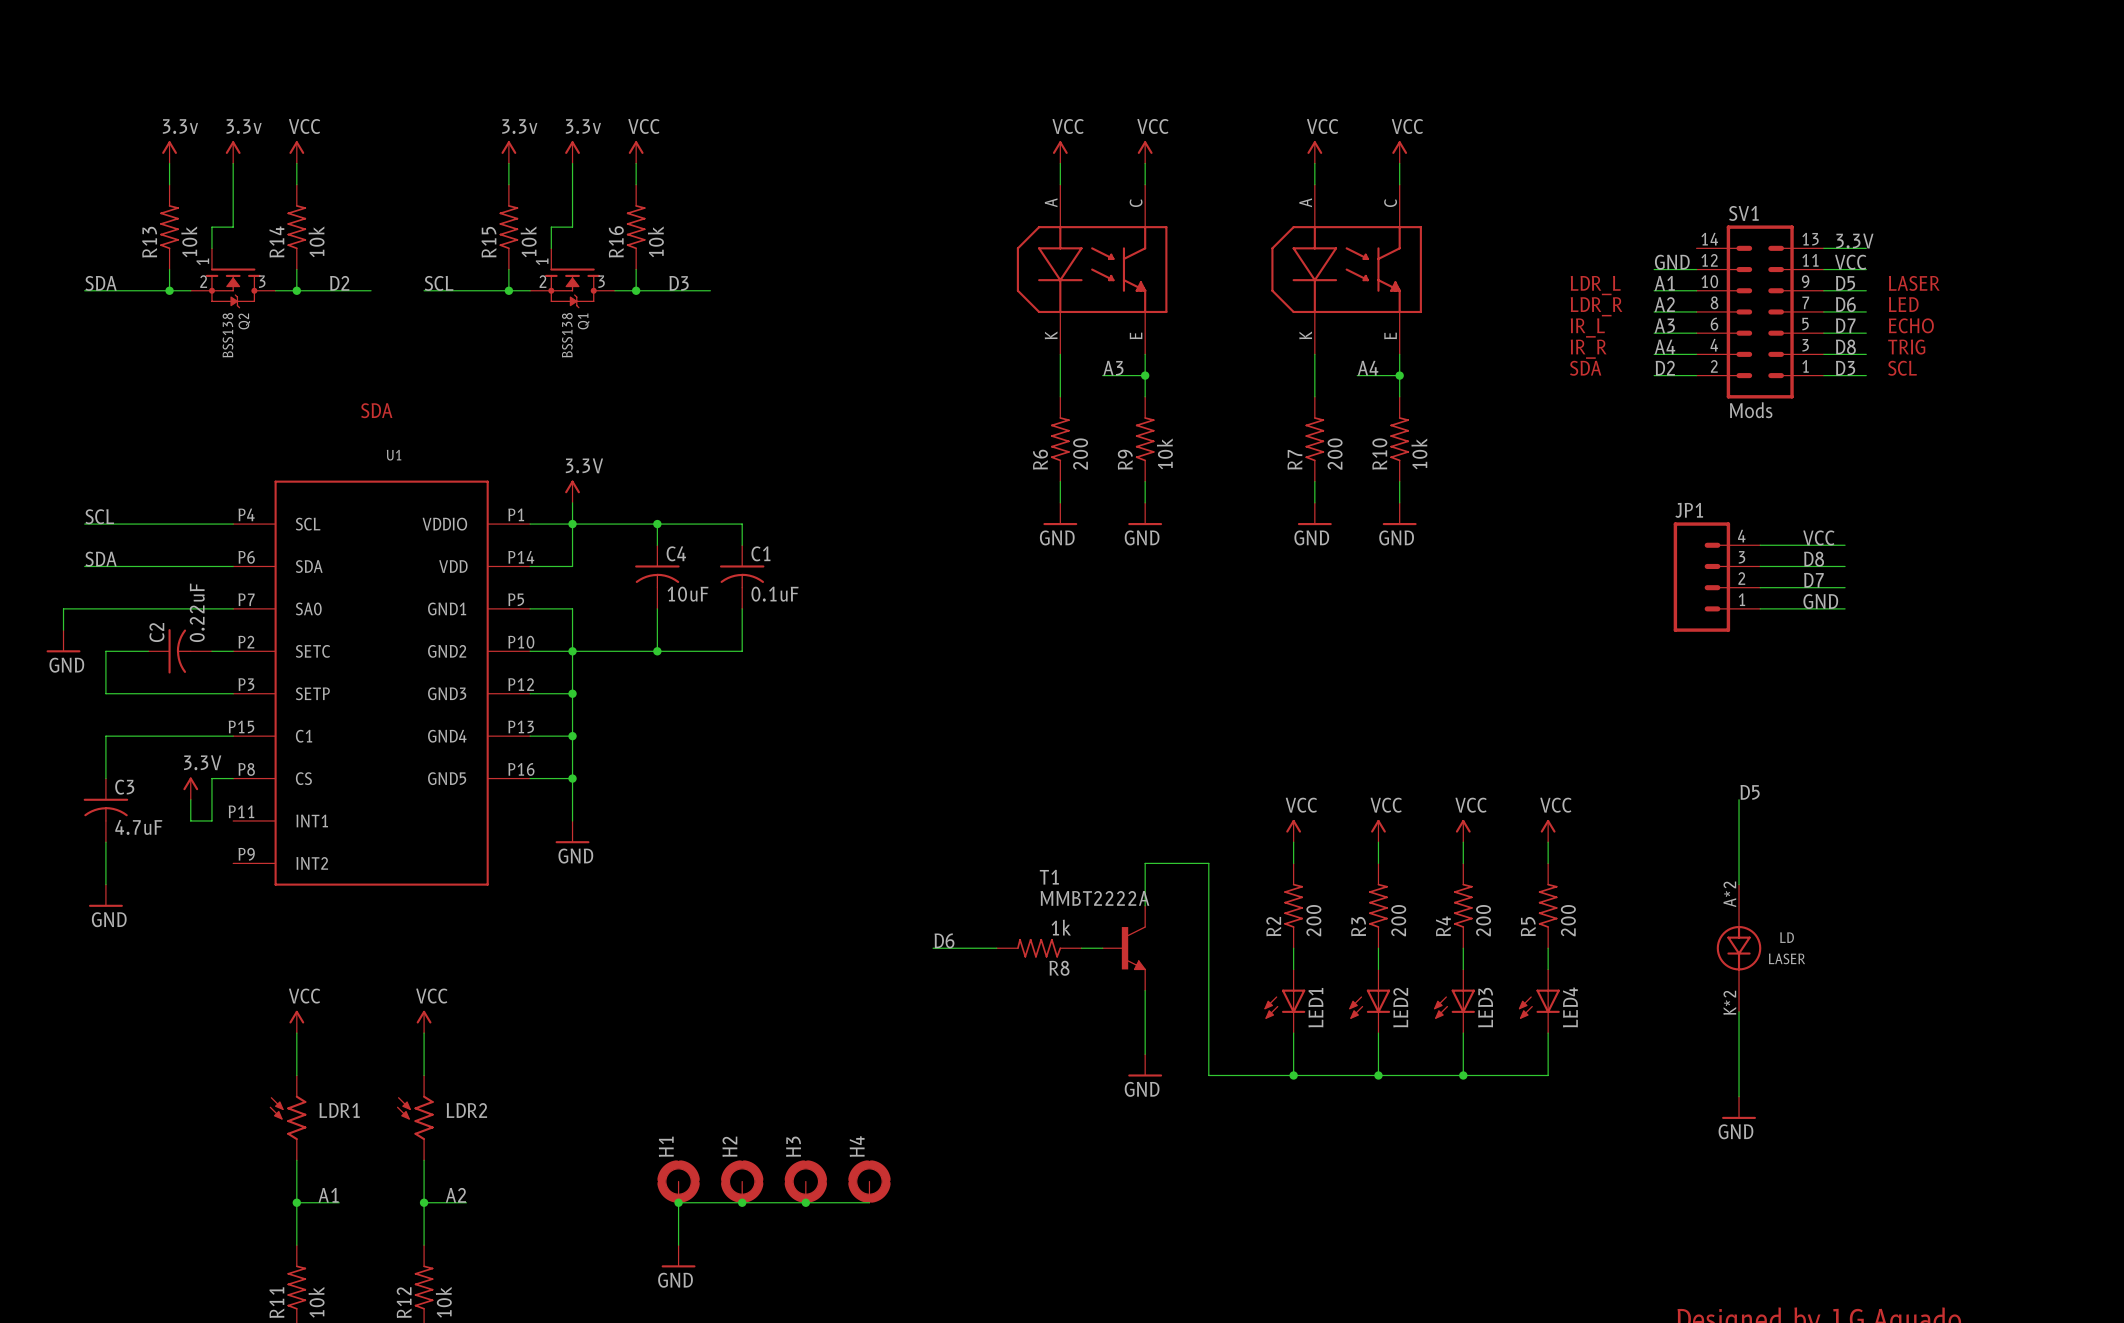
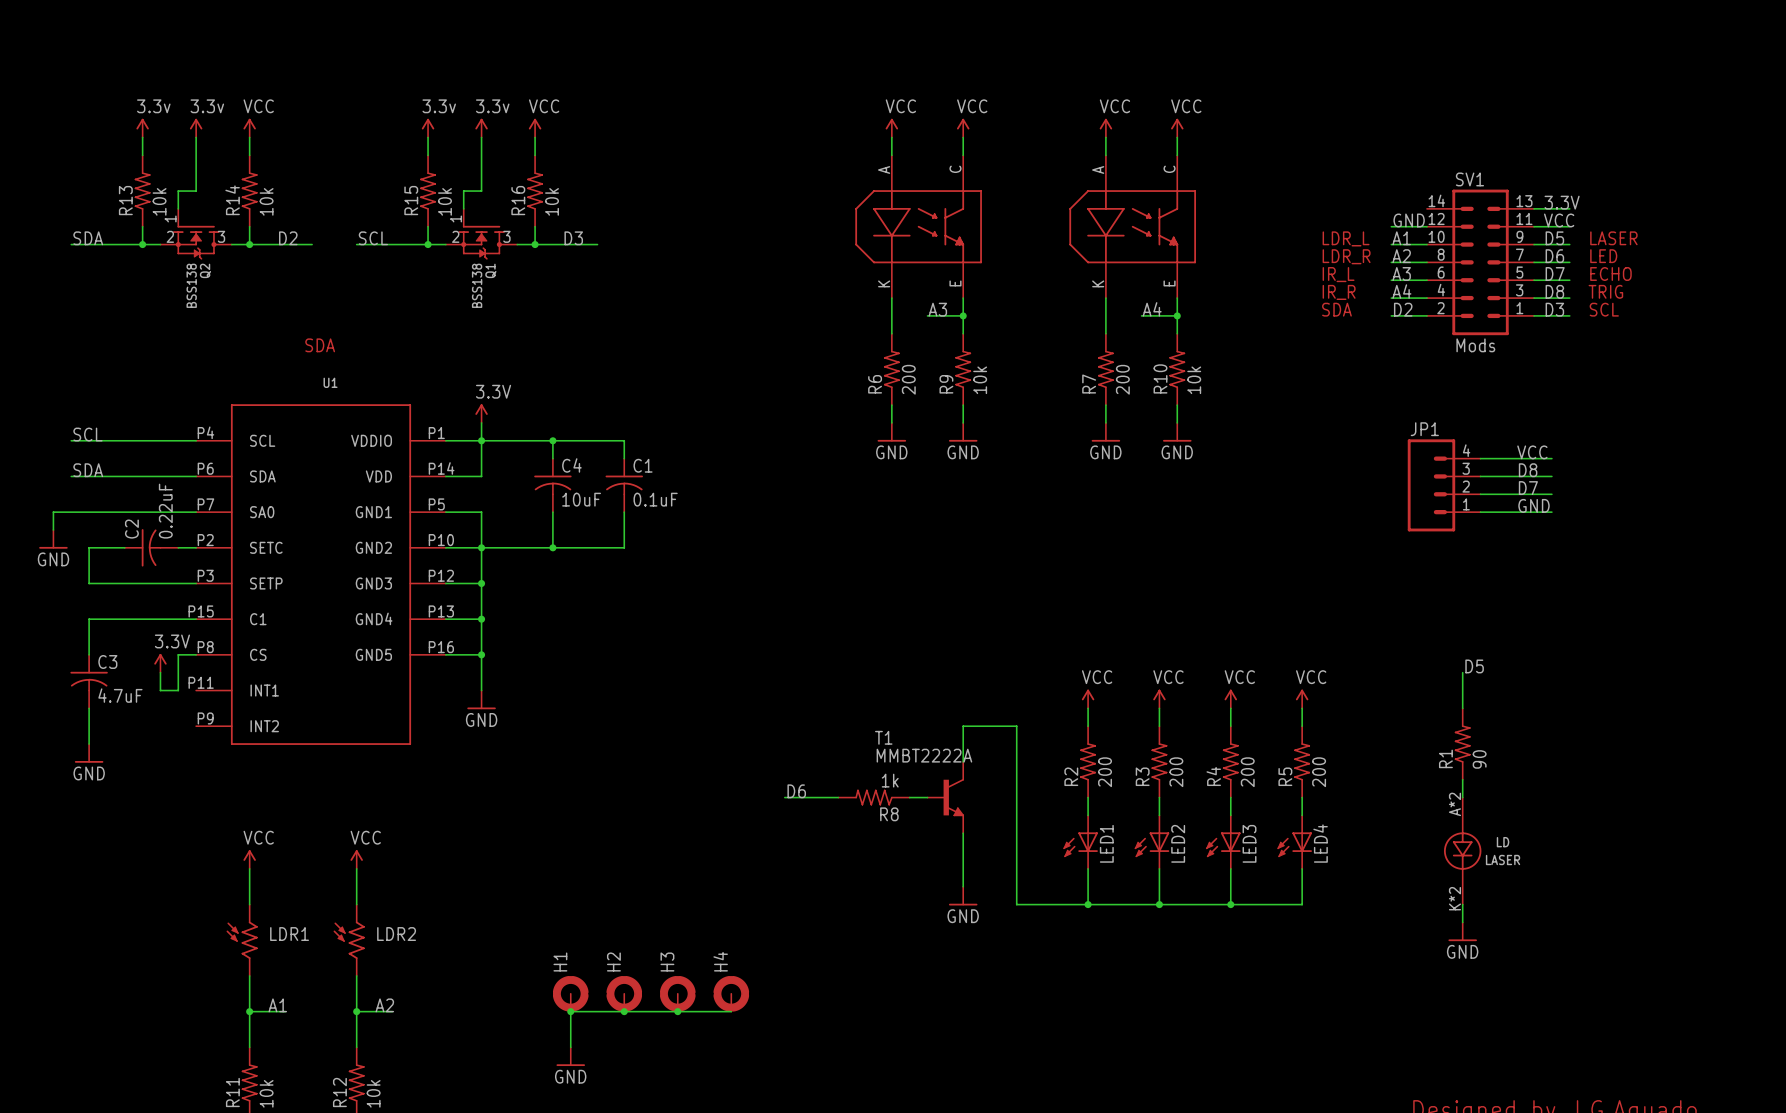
R1: none -> 90 (1462, 744)
LD position: (1739, 948) -> (1462, 851)

